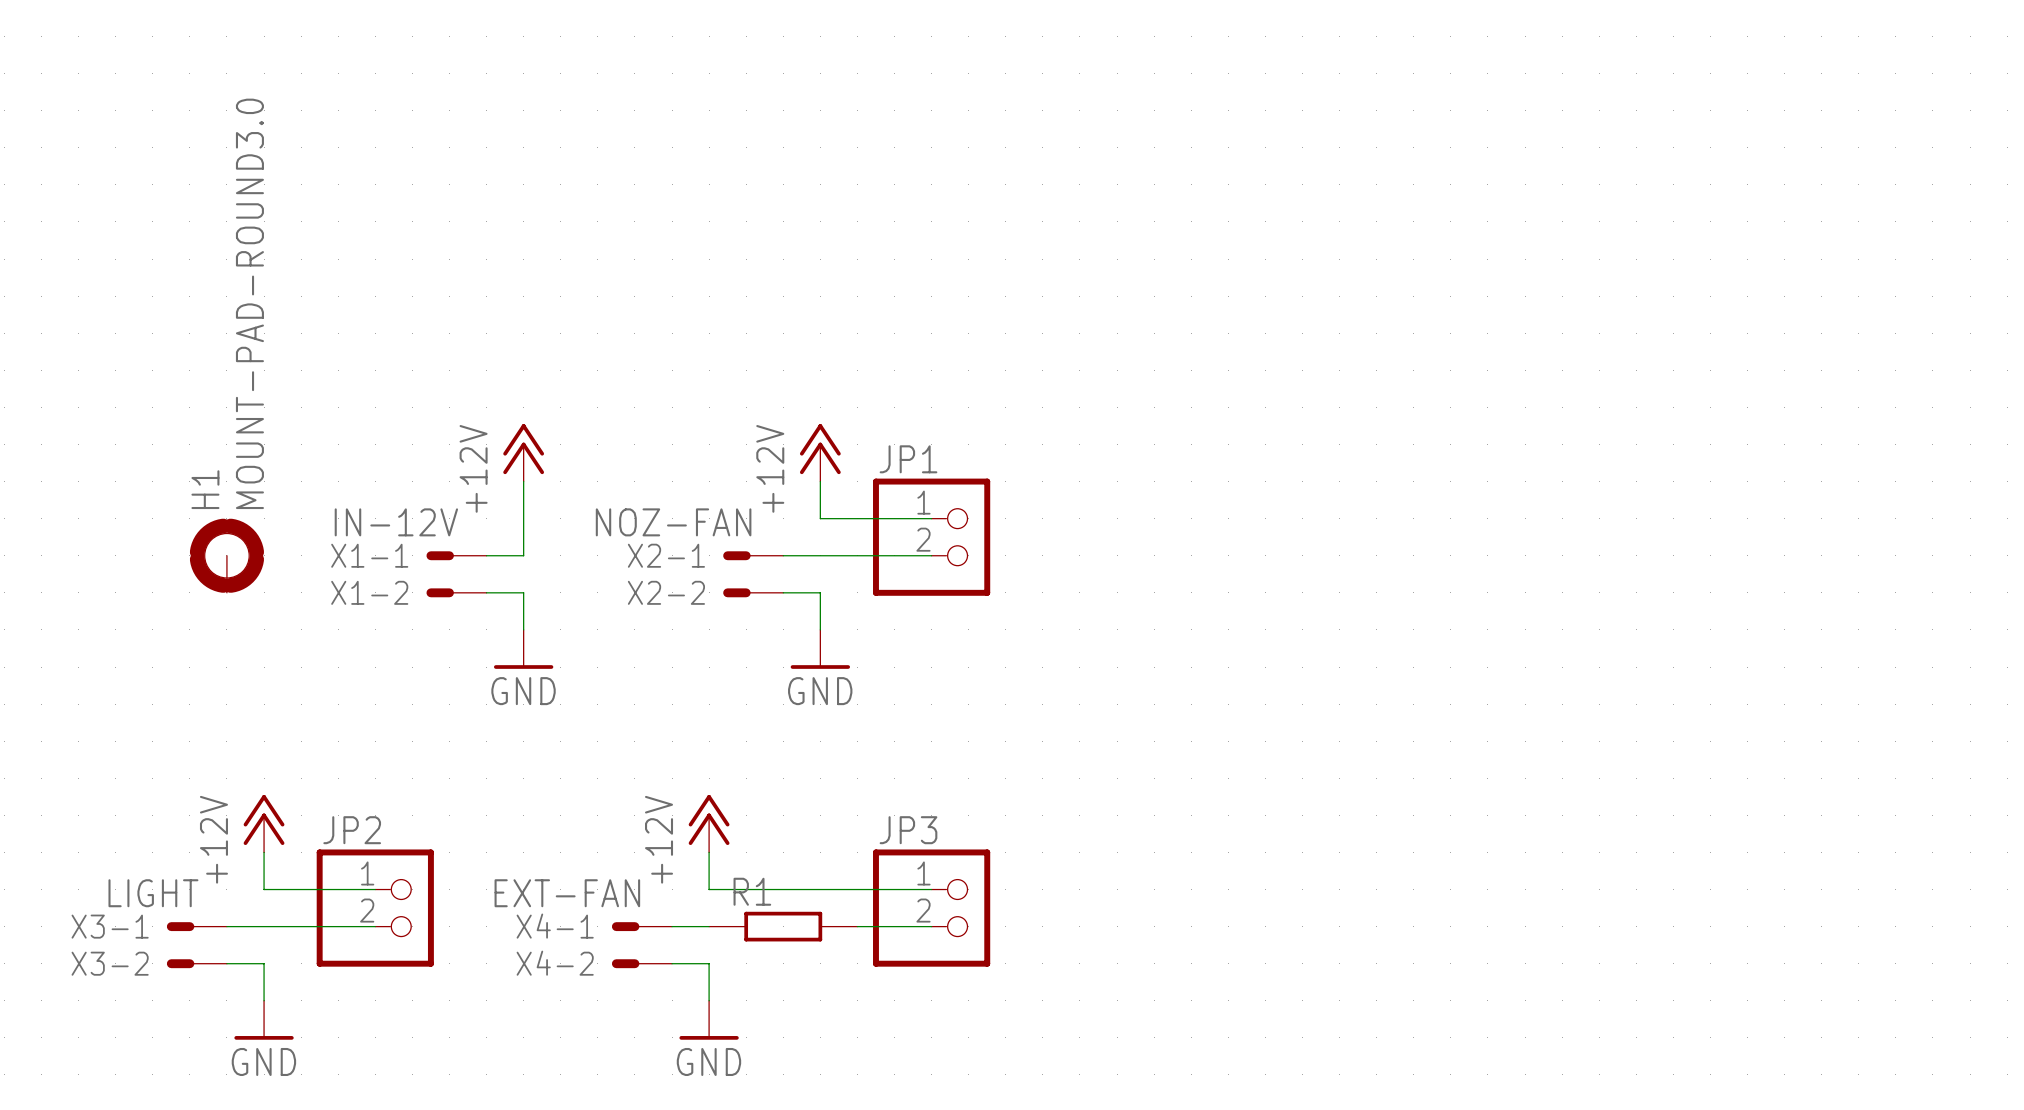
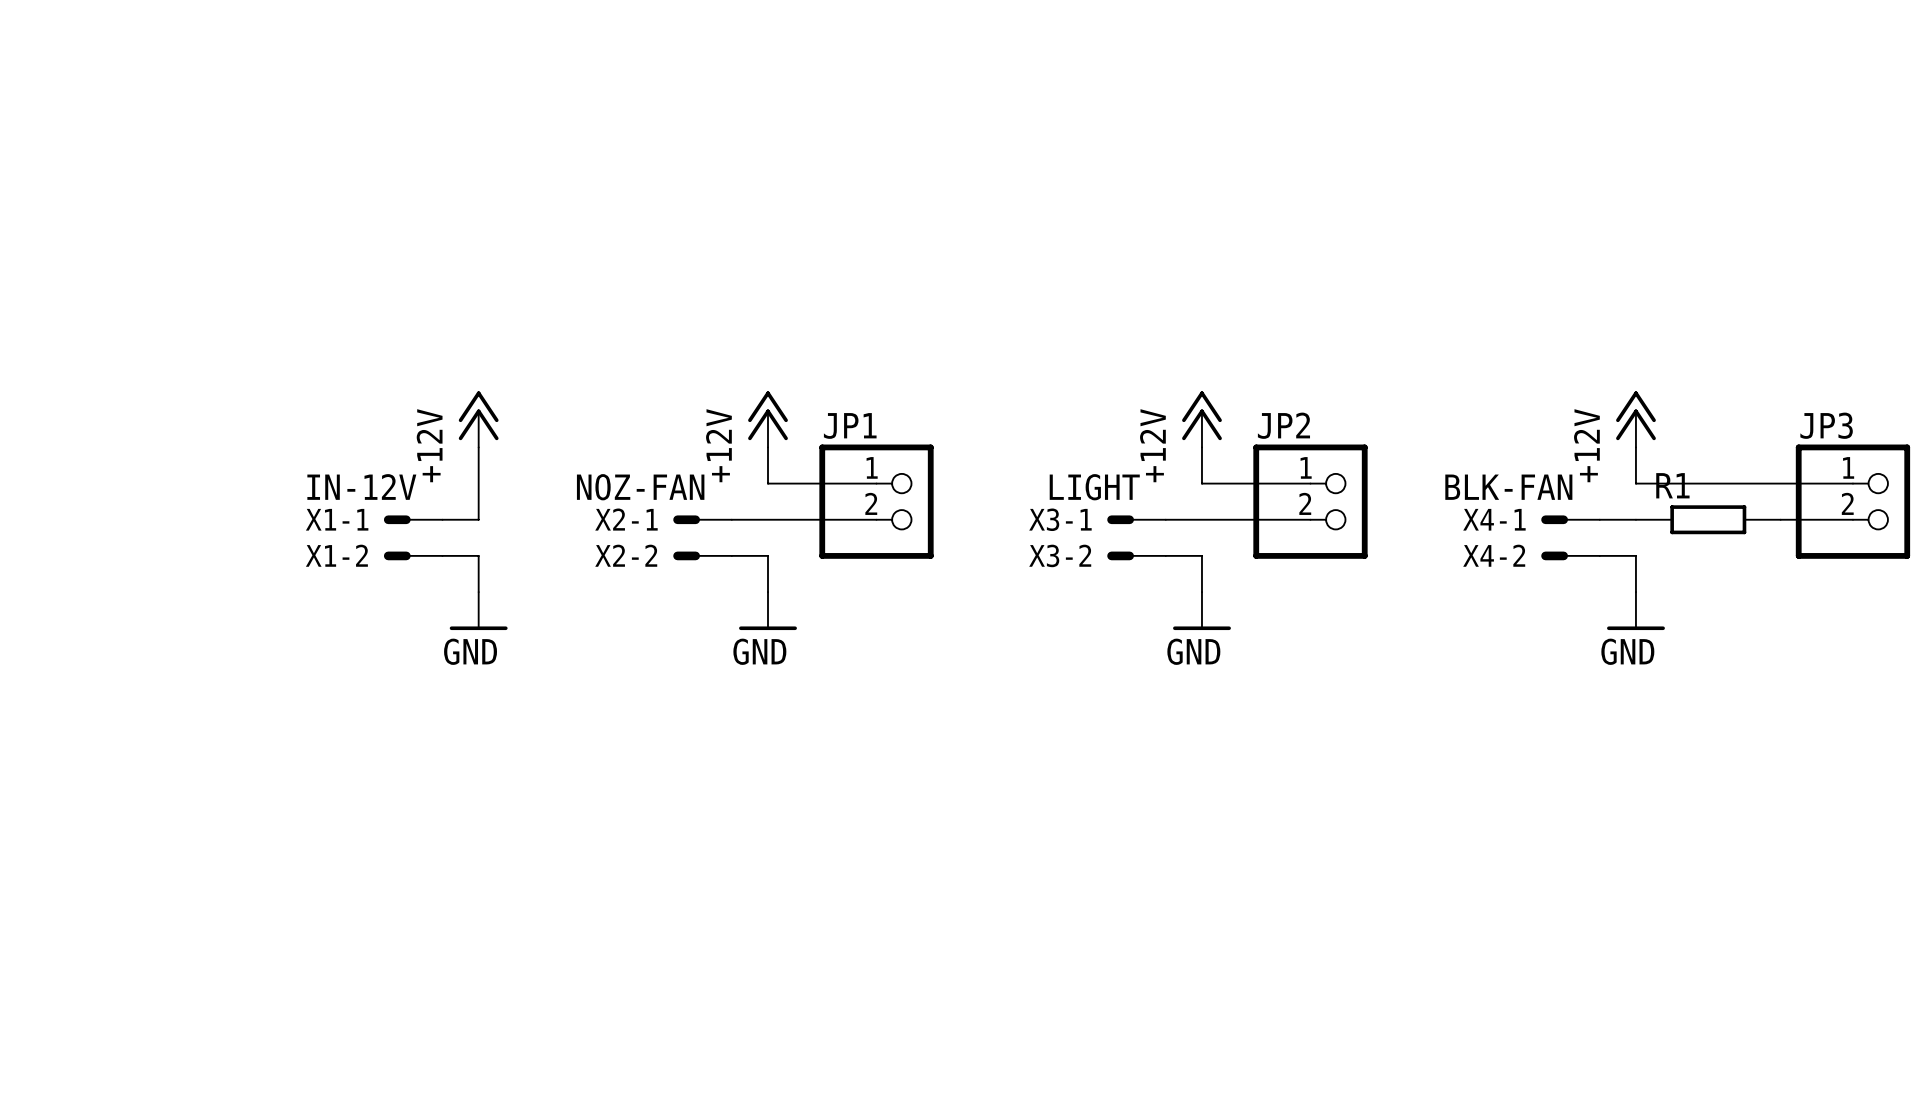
power symbol: none -> +12V (1201, 419)
power symbol: none -> +12V (1635, 419)
wire: none -> (1201, 447) (1201, 483) (1310, 483)
wire: none -> (1635, 447) (1635, 483) (1852, 483)
H1: MOUNT-PAD-ROUND3.0 (226, 555) -> none
wire: none -> (1165, 519) (1310, 519)
wire: none -> (1599, 519) (1635, 519)
wire: none -> (1780, 519) (1852, 519)
wire: none -> (1165, 555) (1201, 555) (1201, 592)
wire: none -> (1599, 555) (1635, 555) (1635, 592)
power symbol: none -> GND (1201, 611)
power symbol: none -> GND (1635, 611)
power symbol: +12V (264, 823) -> none
power symbol: +12V (709, 823) -> none
wire: (264, 852) (264, 889) (375, 889) -> none
wire: (709, 852) (709, 889) (931, 889) -> none
X4-1 value: EXT-FAN (567, 893) -> BLK-FAN (1508, 487)
JP2 position: (375, 908) -> (1310, 501)
JP3 position: (931, 908) -> (1852, 501)
X3-1 position: (196, 926) -> (1136, 519)
wire: (226, 926) (375, 926) -> none
X4-1 position: (641, 926) -> (1570, 519)
wire: (672, 926) (709, 926) -> none
R1 position: (783, 926) -> (1708, 519)
wire: (857, 926) (931, 926) -> none
X3-2 position: (196, 963) -> (1136, 555)
wire: (226, 963) (264, 963) (264, 1000) -> none
X4-2 position: (641, 963) -> (1570, 555)
wire: (672, 963) (709, 963) (709, 1000) -> none
power symbol: GND (264, 1020) -> none
power symbol: GND (709, 1020) -> none

